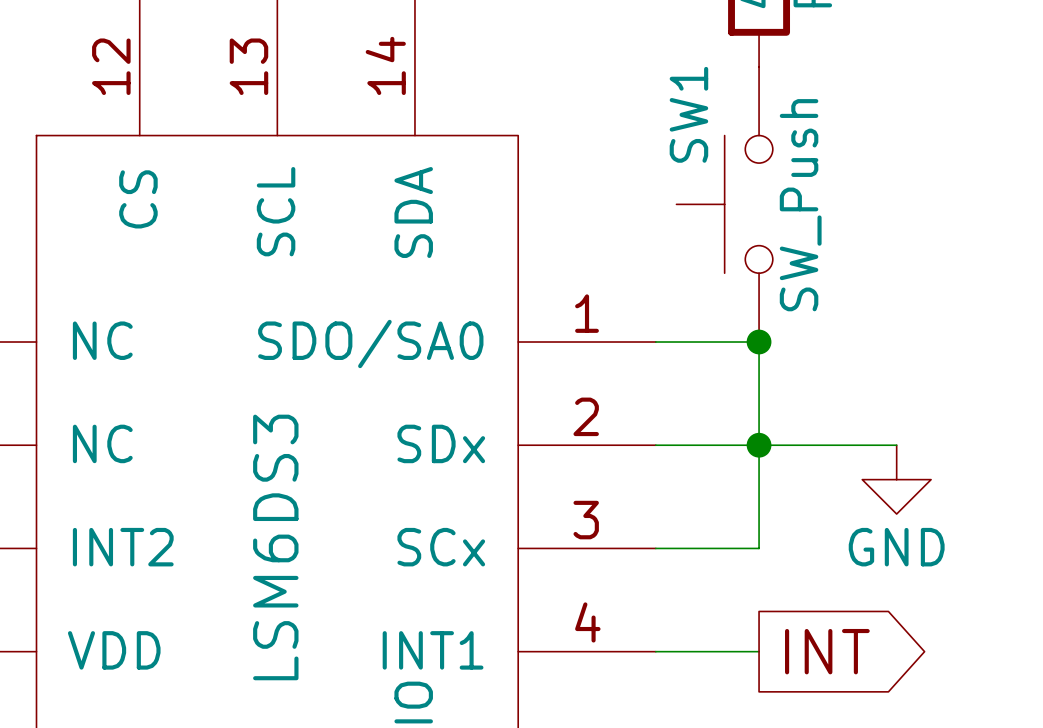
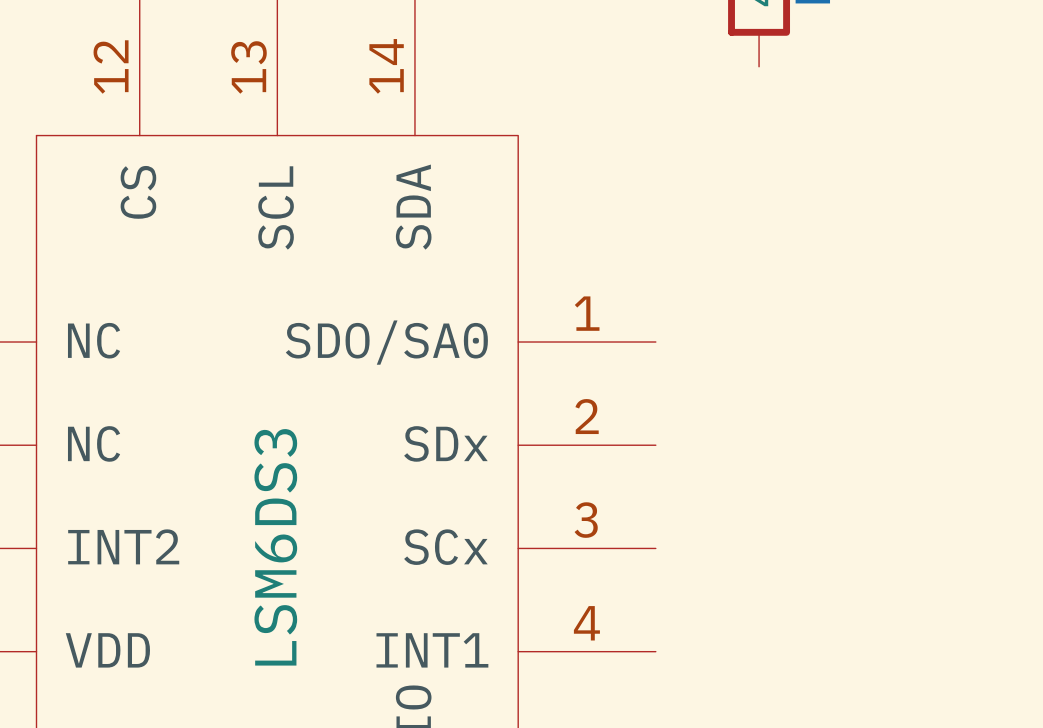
SW1: SW_Push (724, 204) -> none
wire: (655, 342) (759, 342) (759, 548) (655, 548) -> none
junction: (759, 342) -> none
wire: (655, 445) (896, 445) -> none
junction: (759, 445) -> none
power symbol: GND (896, 479) -> none
wire: (655, 651) (759, 651) -> none
global label: INT (827, 651) -> none

